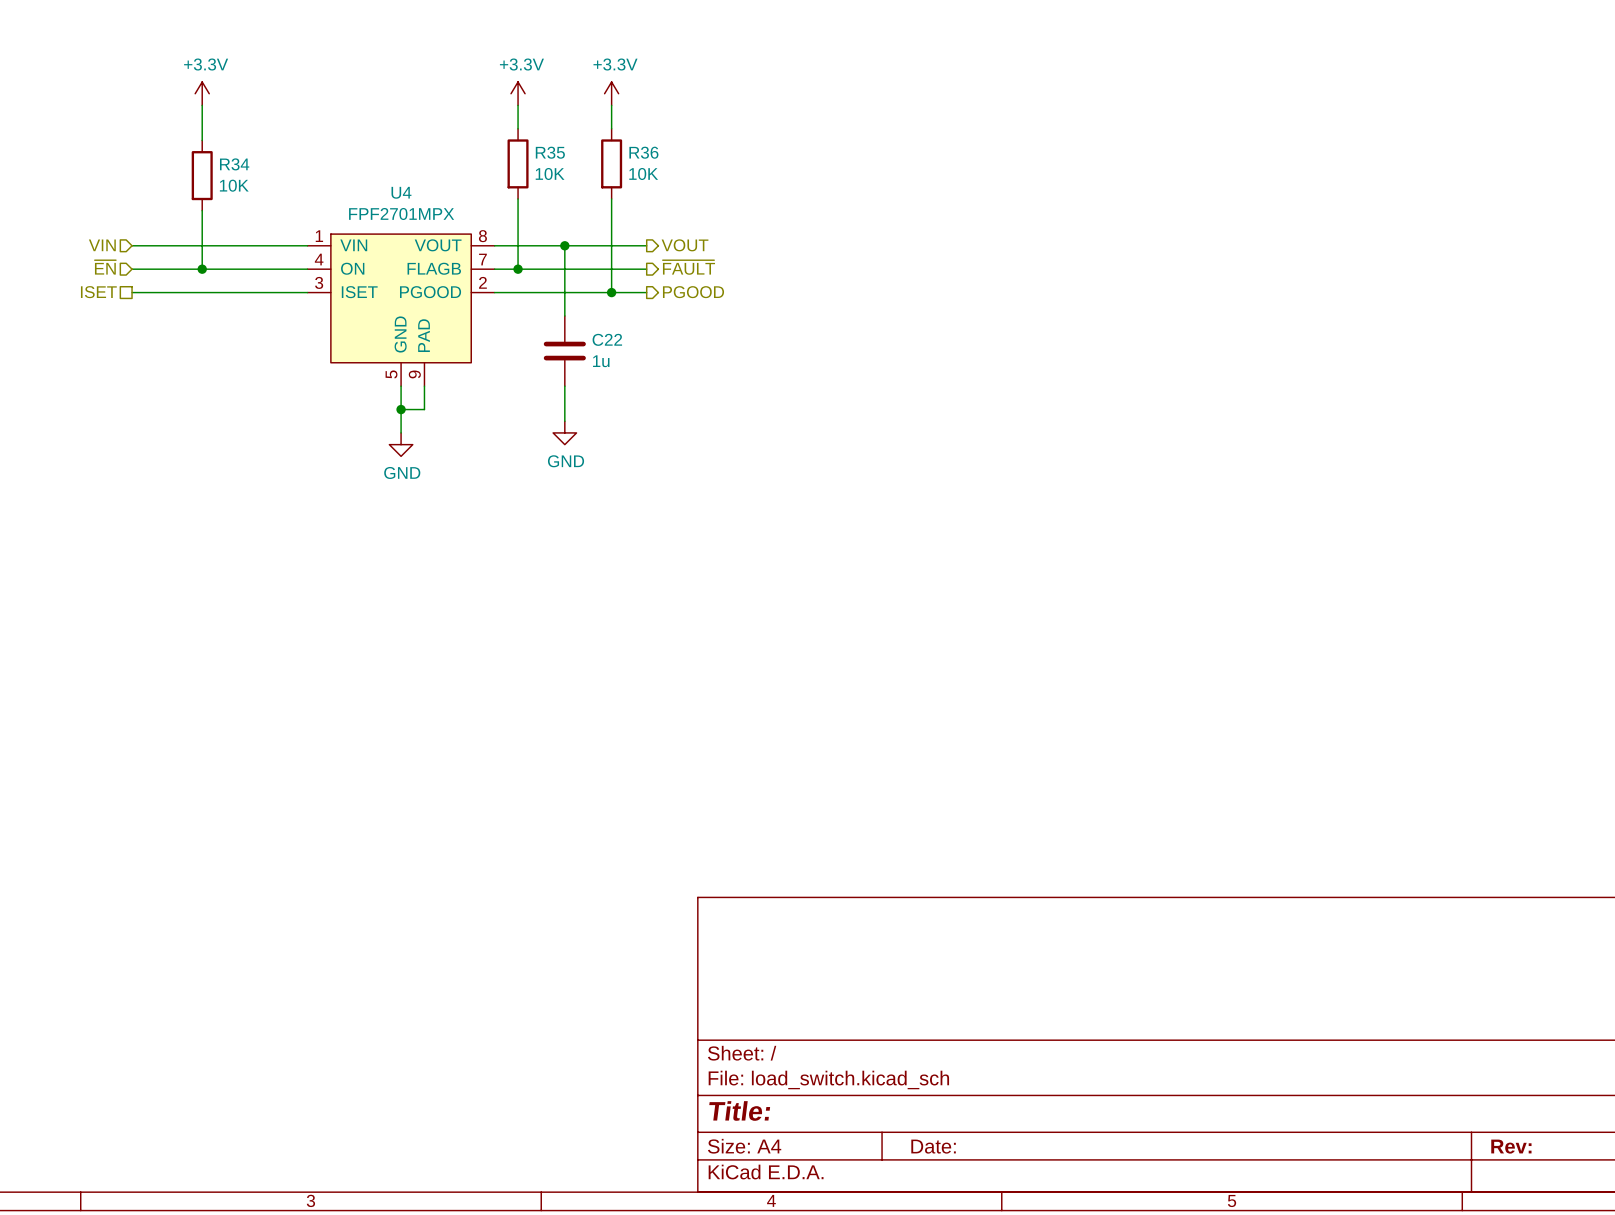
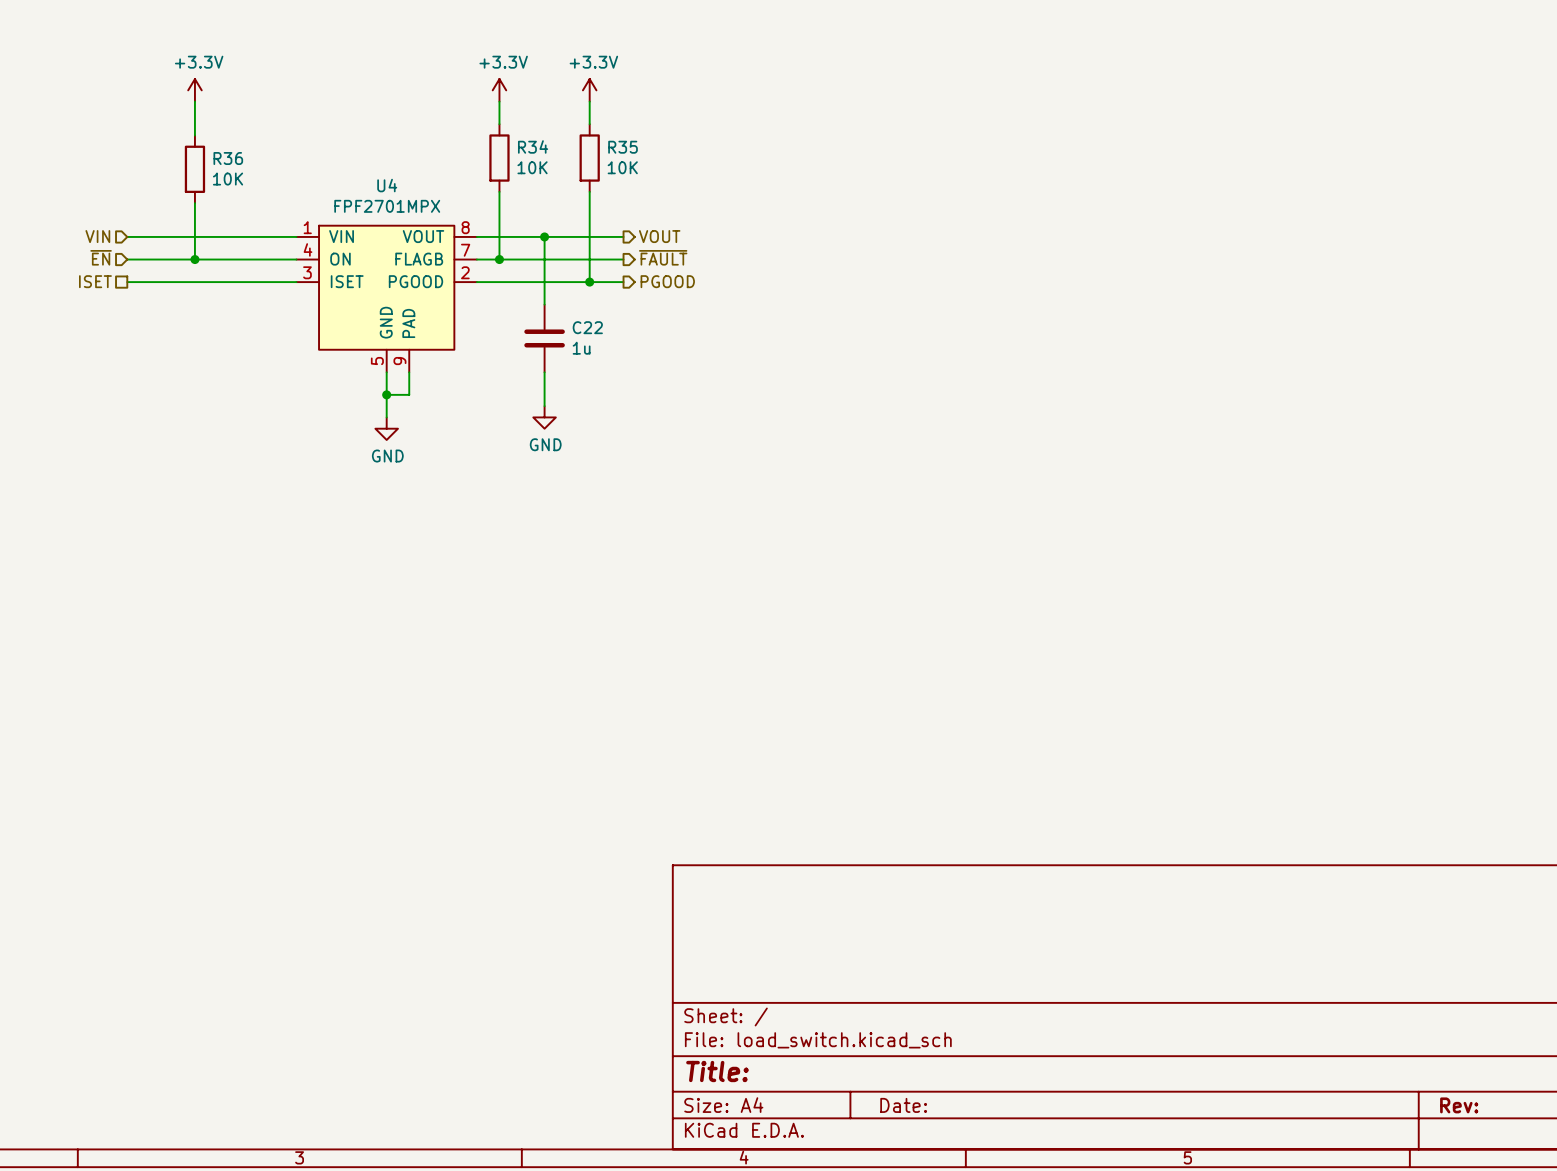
R35 name: R35 (550, 152) -> R34 (533, 146)
R36 name: R36 (643, 152) -> R35 (623, 147)
R34 name: R34 (234, 164) -> R36 (228, 158)

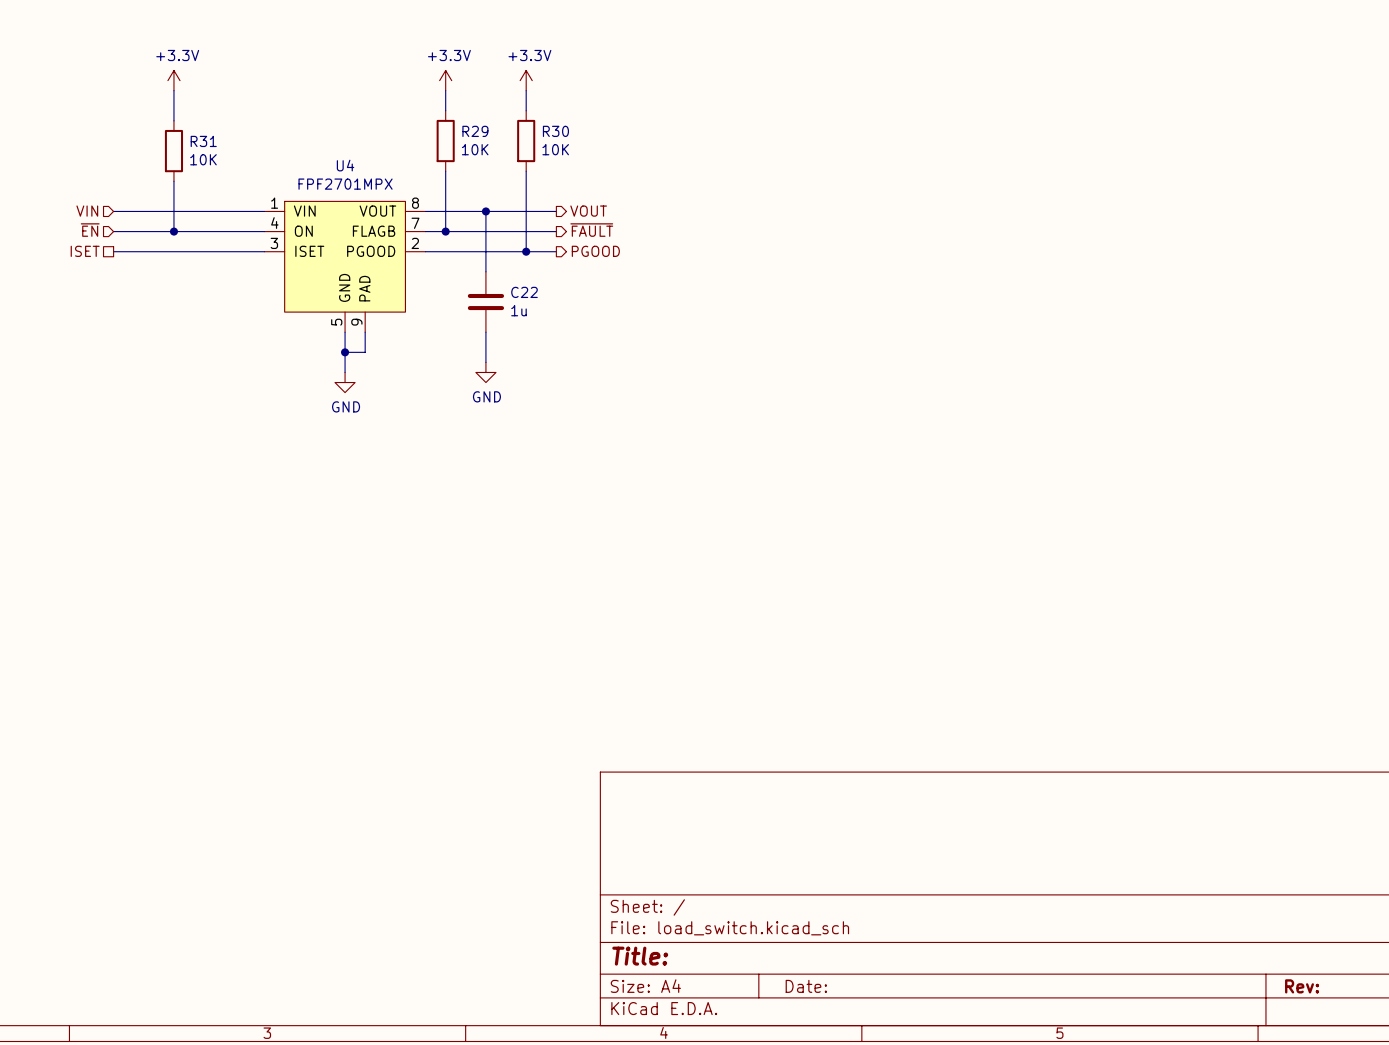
R34 name: R34 (533, 146) -> R29 (475, 131)
R35 name: R35 (623, 147) -> R30 (555, 131)
R36 name: R36 (228, 158) -> R31 (203, 141)

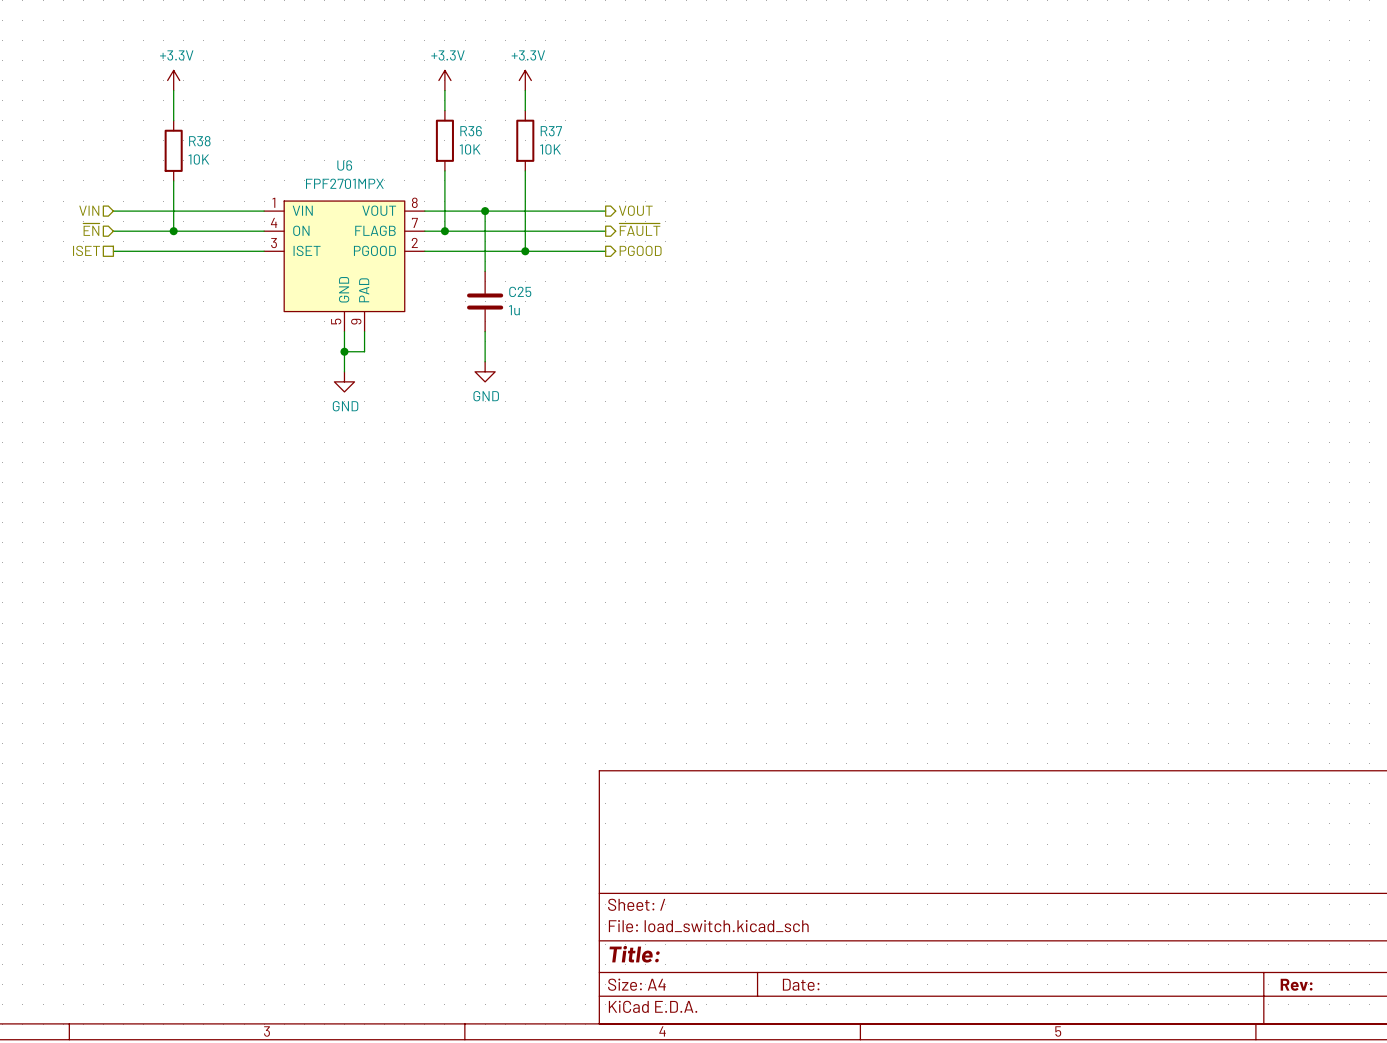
R29 name: R29 (475, 131) -> R36 (471, 131)
R30 name: R30 (555, 131) -> R37 (551, 131)
R31 name: R31 (203, 141) -> R38 (199, 141)
U4 name: U4 (345, 165) -> U6 (344, 165)
wire: none -> (555, 211) (605, 211)
hierarchical label position: VOUT (588, 211) -> VOUT (635, 210)
hierarchical label position: ~{FAULT} (591, 230) -> ~{FAULT} (639, 229)
wire: none -> (555, 231) (605, 231)
wire: none -> (555, 251) (605, 251)
hierarchical label position: PGOOD (595, 251) -> PGOOD (640, 250)
C22 name: C22 (524, 292) -> C25 (520, 291)

